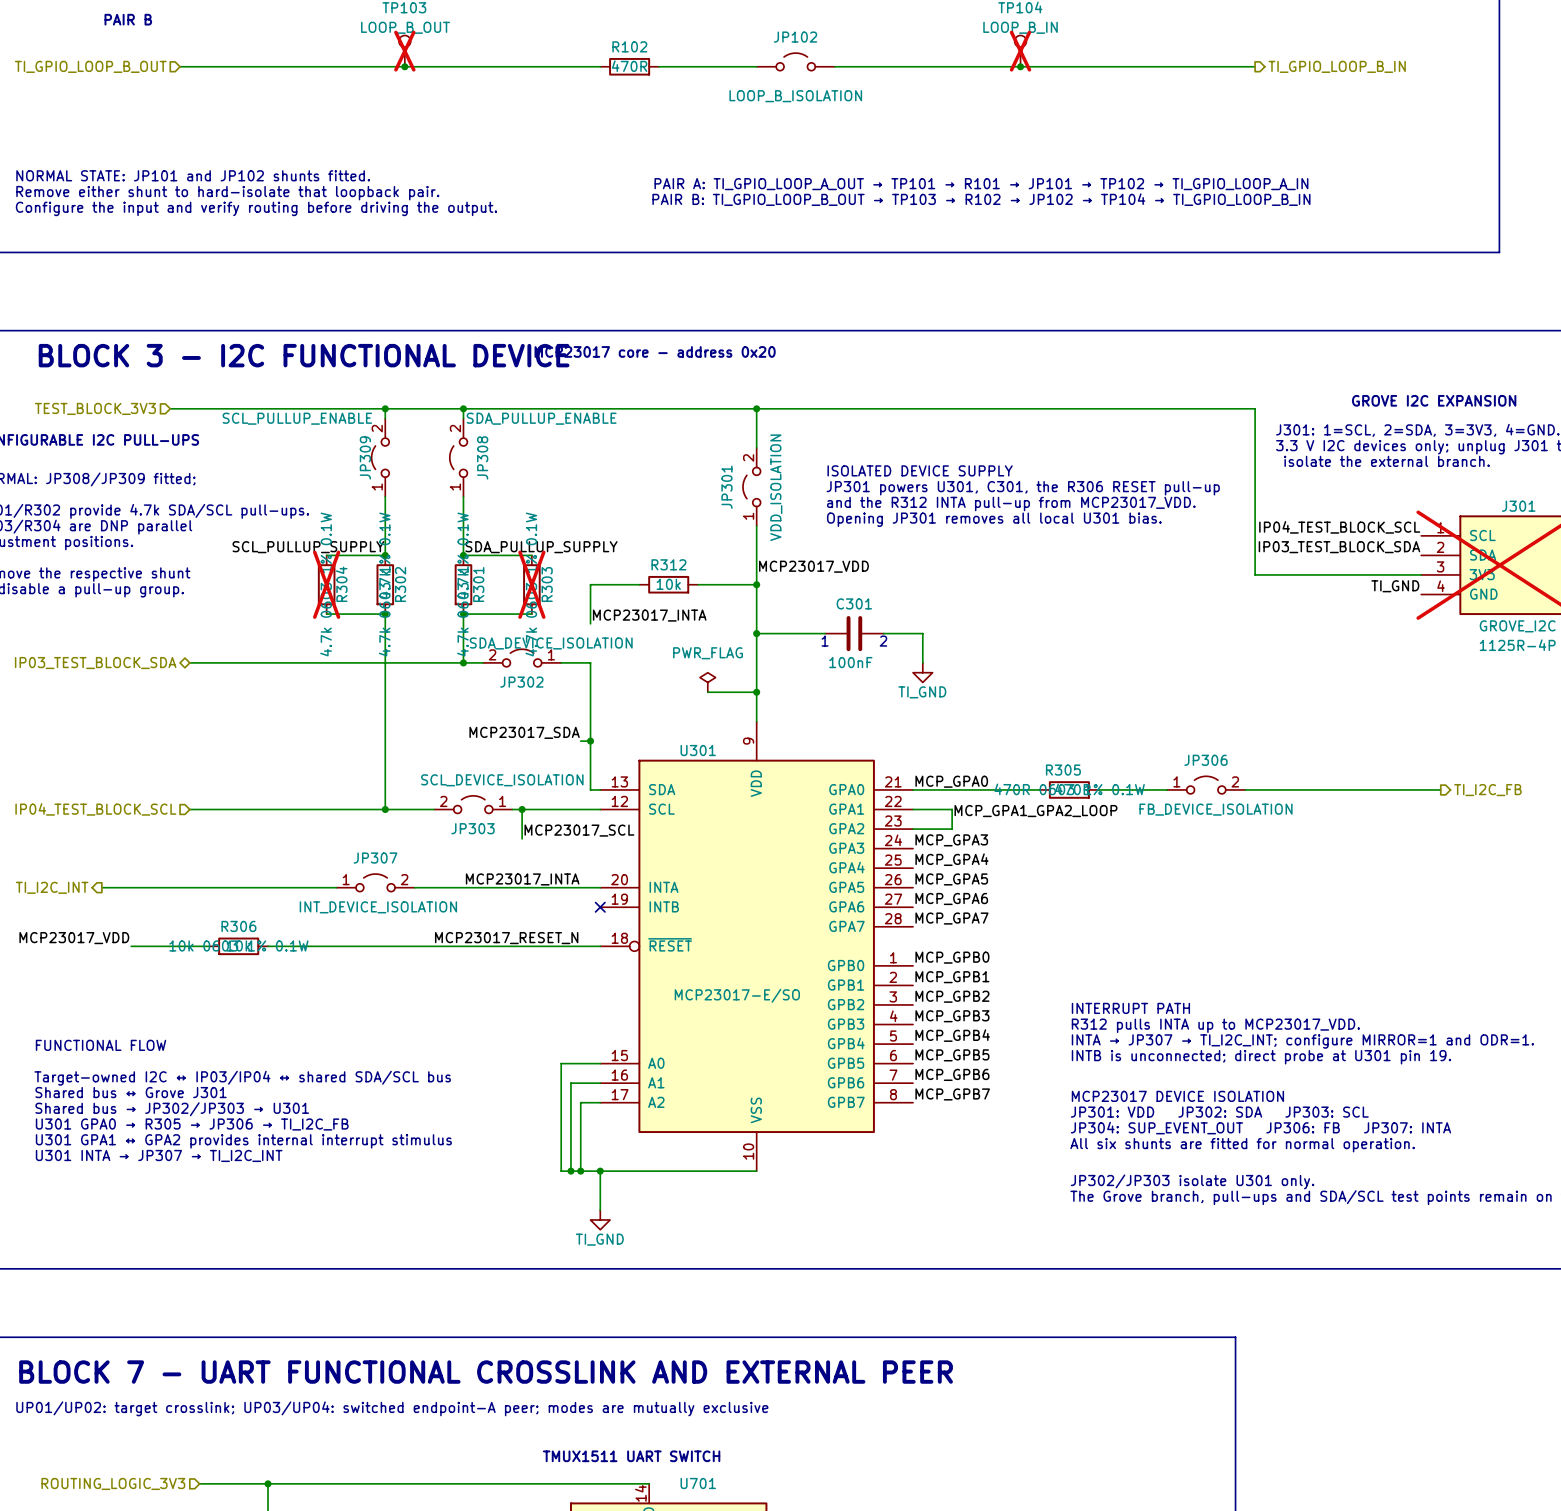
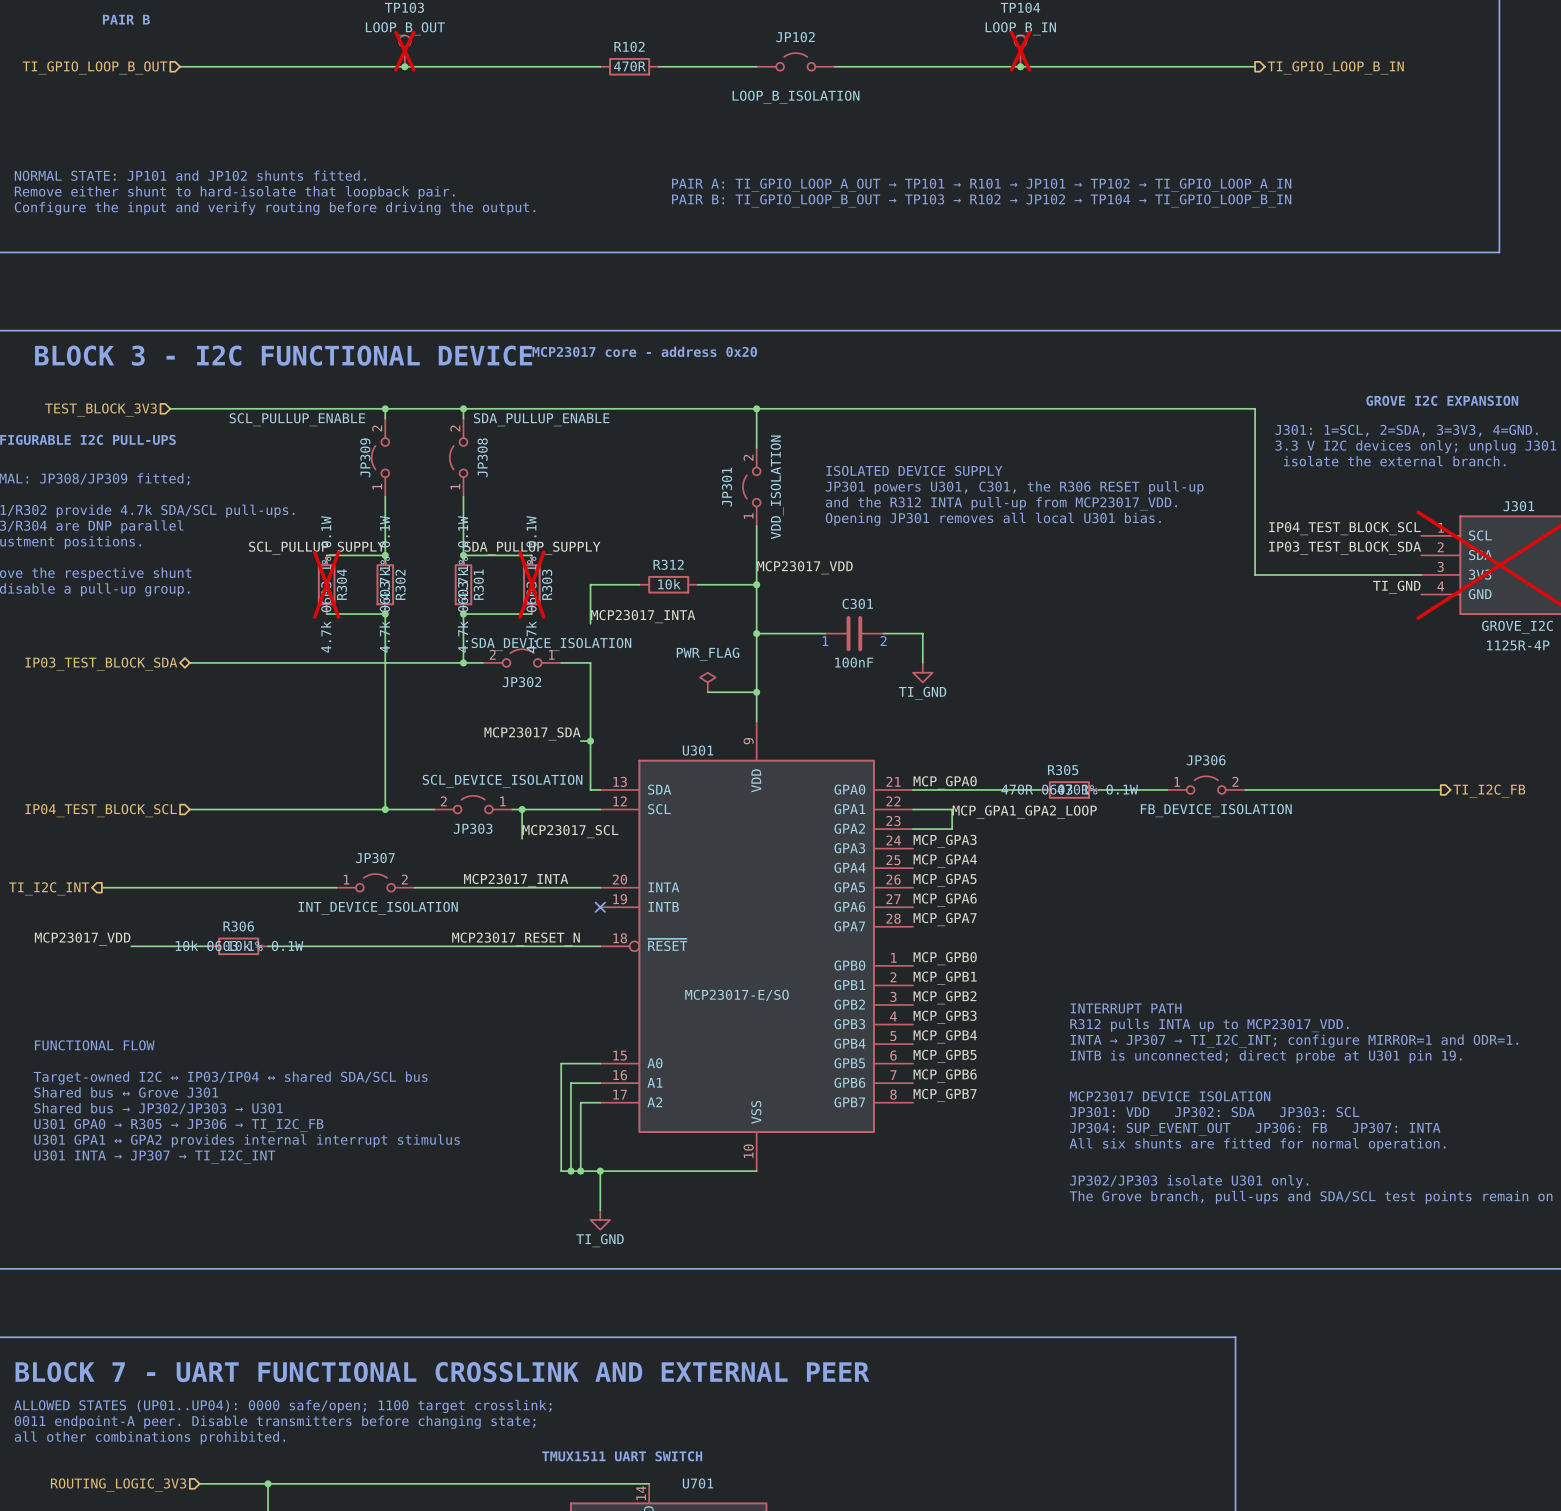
text: UP01/UP02: target crosslink; UP03/UP04: switched endpoint-A peer; modes are mutually exclusive (392, 1408) -> ALLOWED STATES (UP01..UP04): 0000 safe/open; 1100 target crosslink; (282, 1406)
text: none -> 0011 endpoint-A peer. Disable transmitters before changing state; (275, 1422)
text: none -> all other combinations prohibited. (149, 1437)

